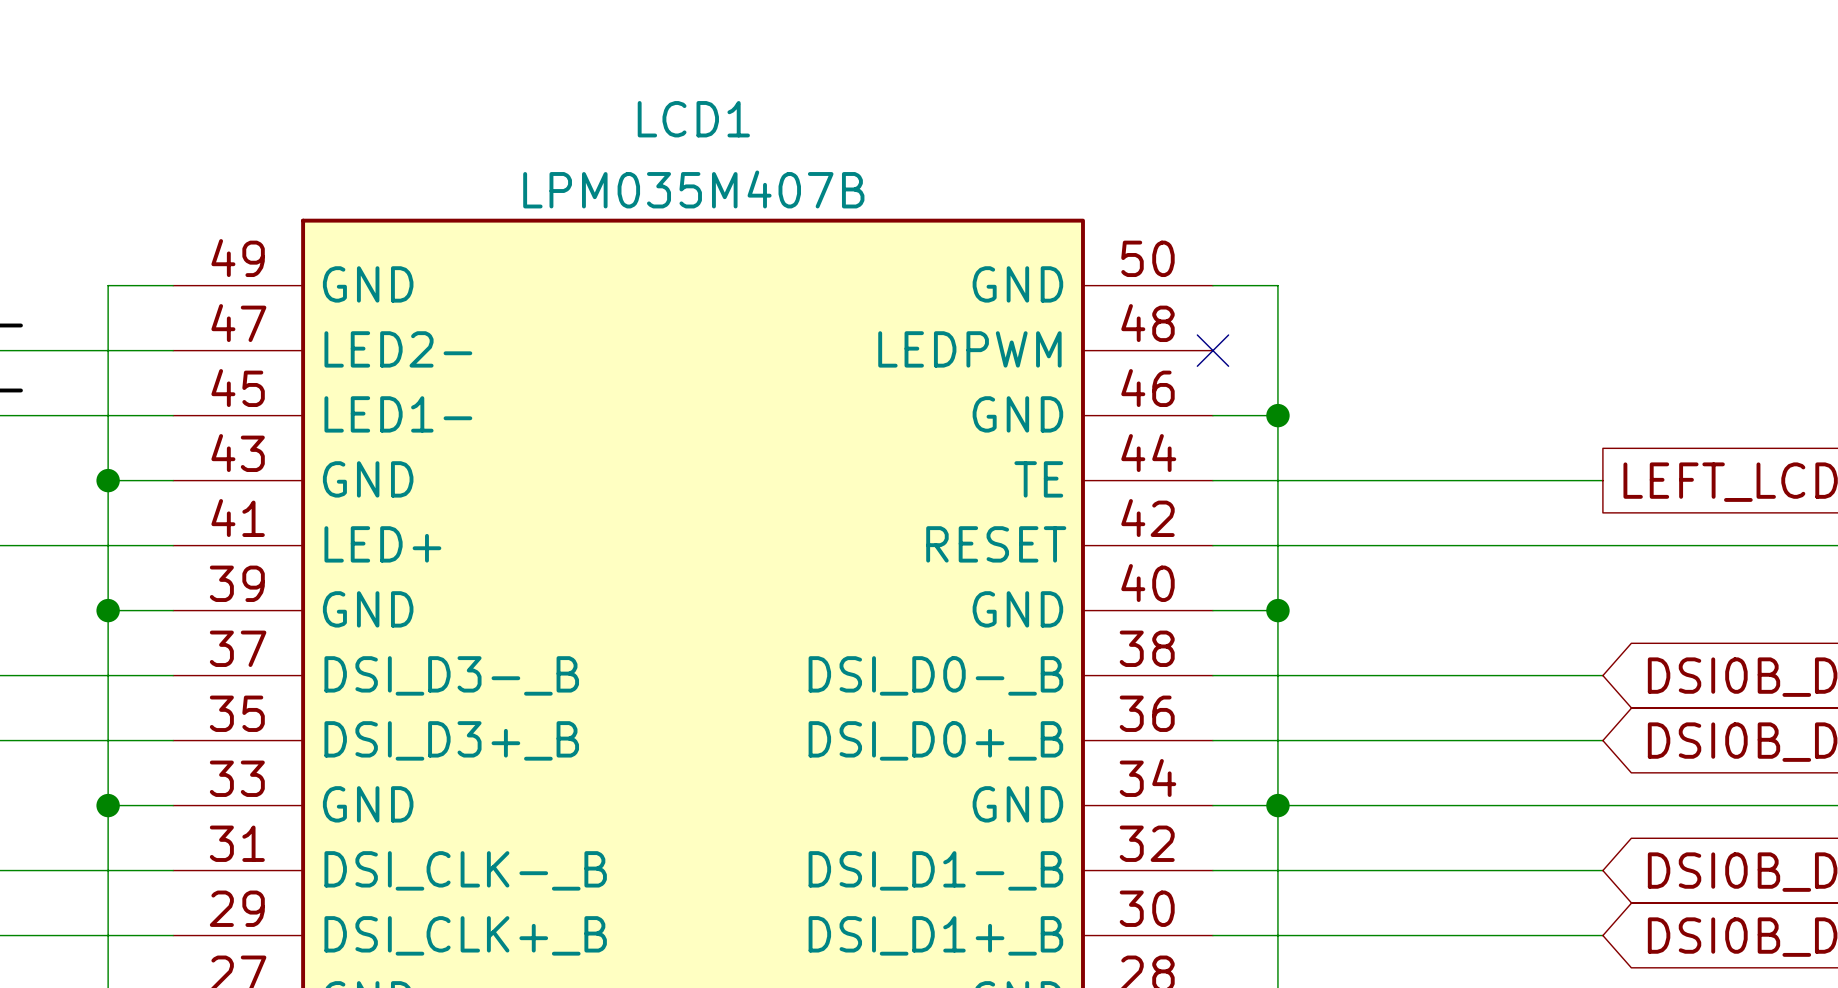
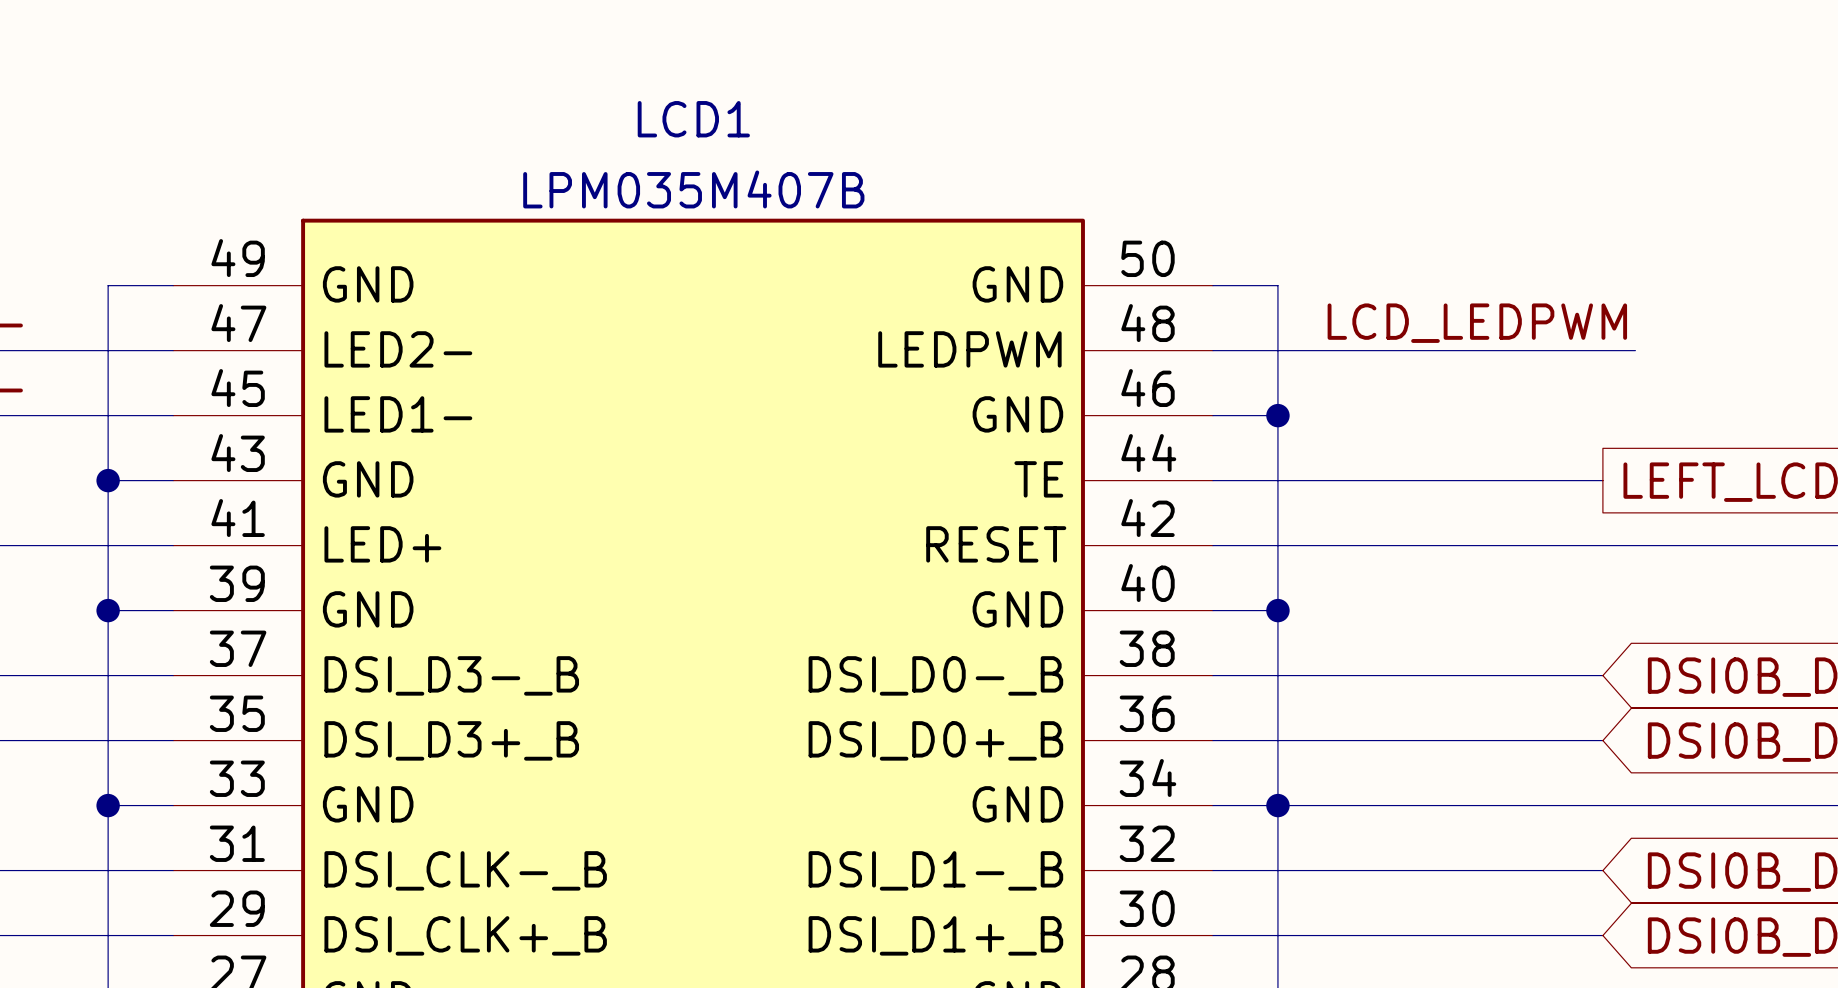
label: none -> LCD_LEDPWM (1477, 323)
wire: none -> (1212, 350) (1635, 350)
no-connect mark: (1212, 350) -> none

